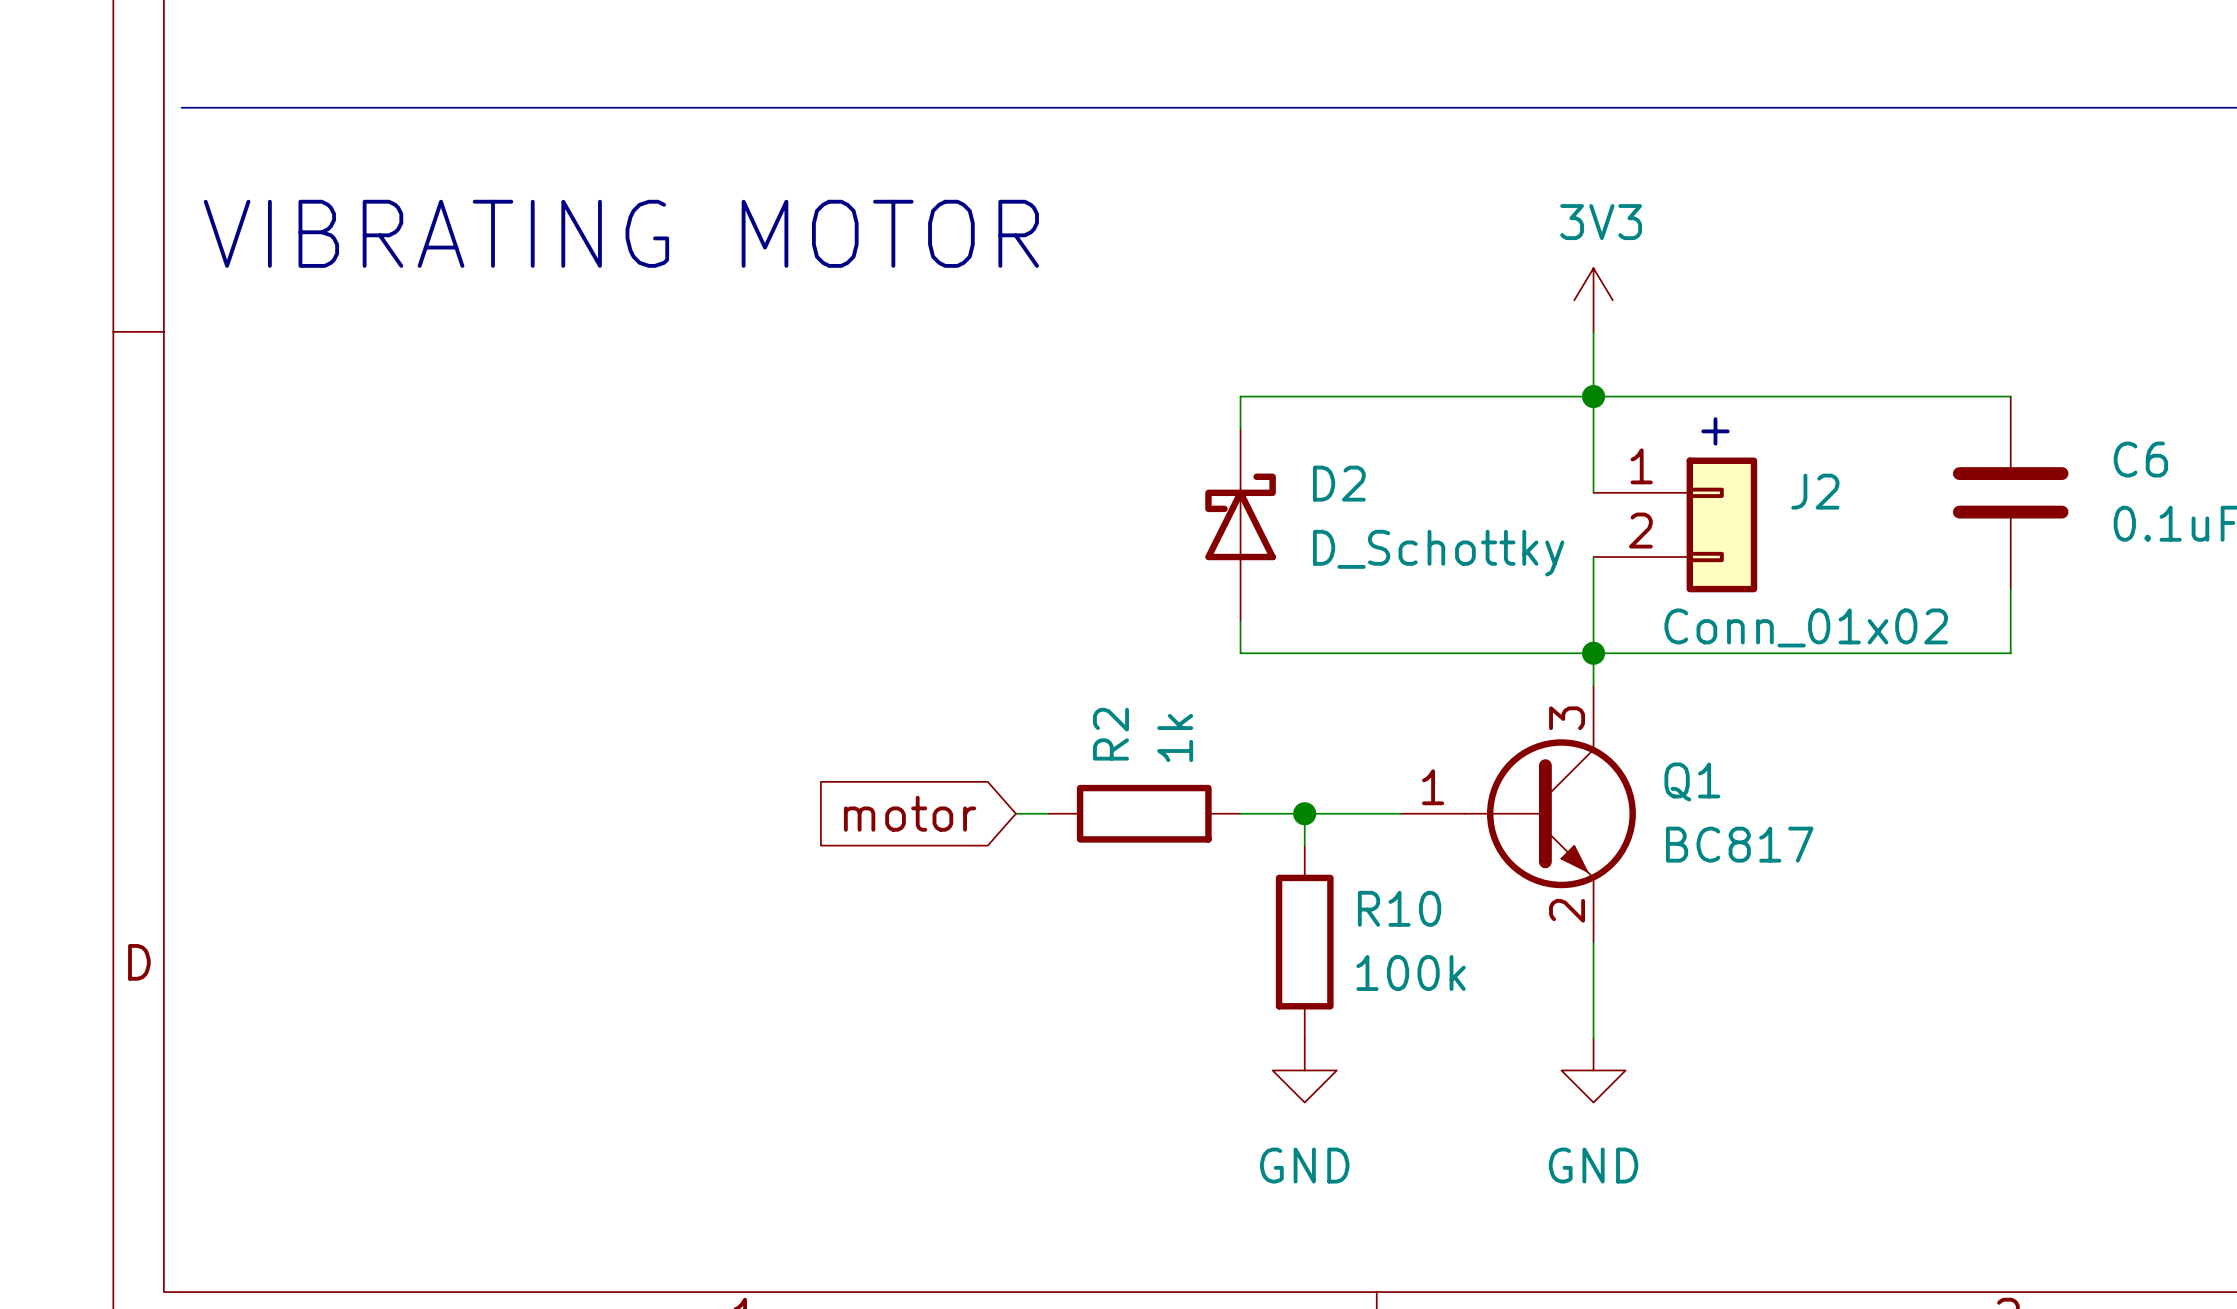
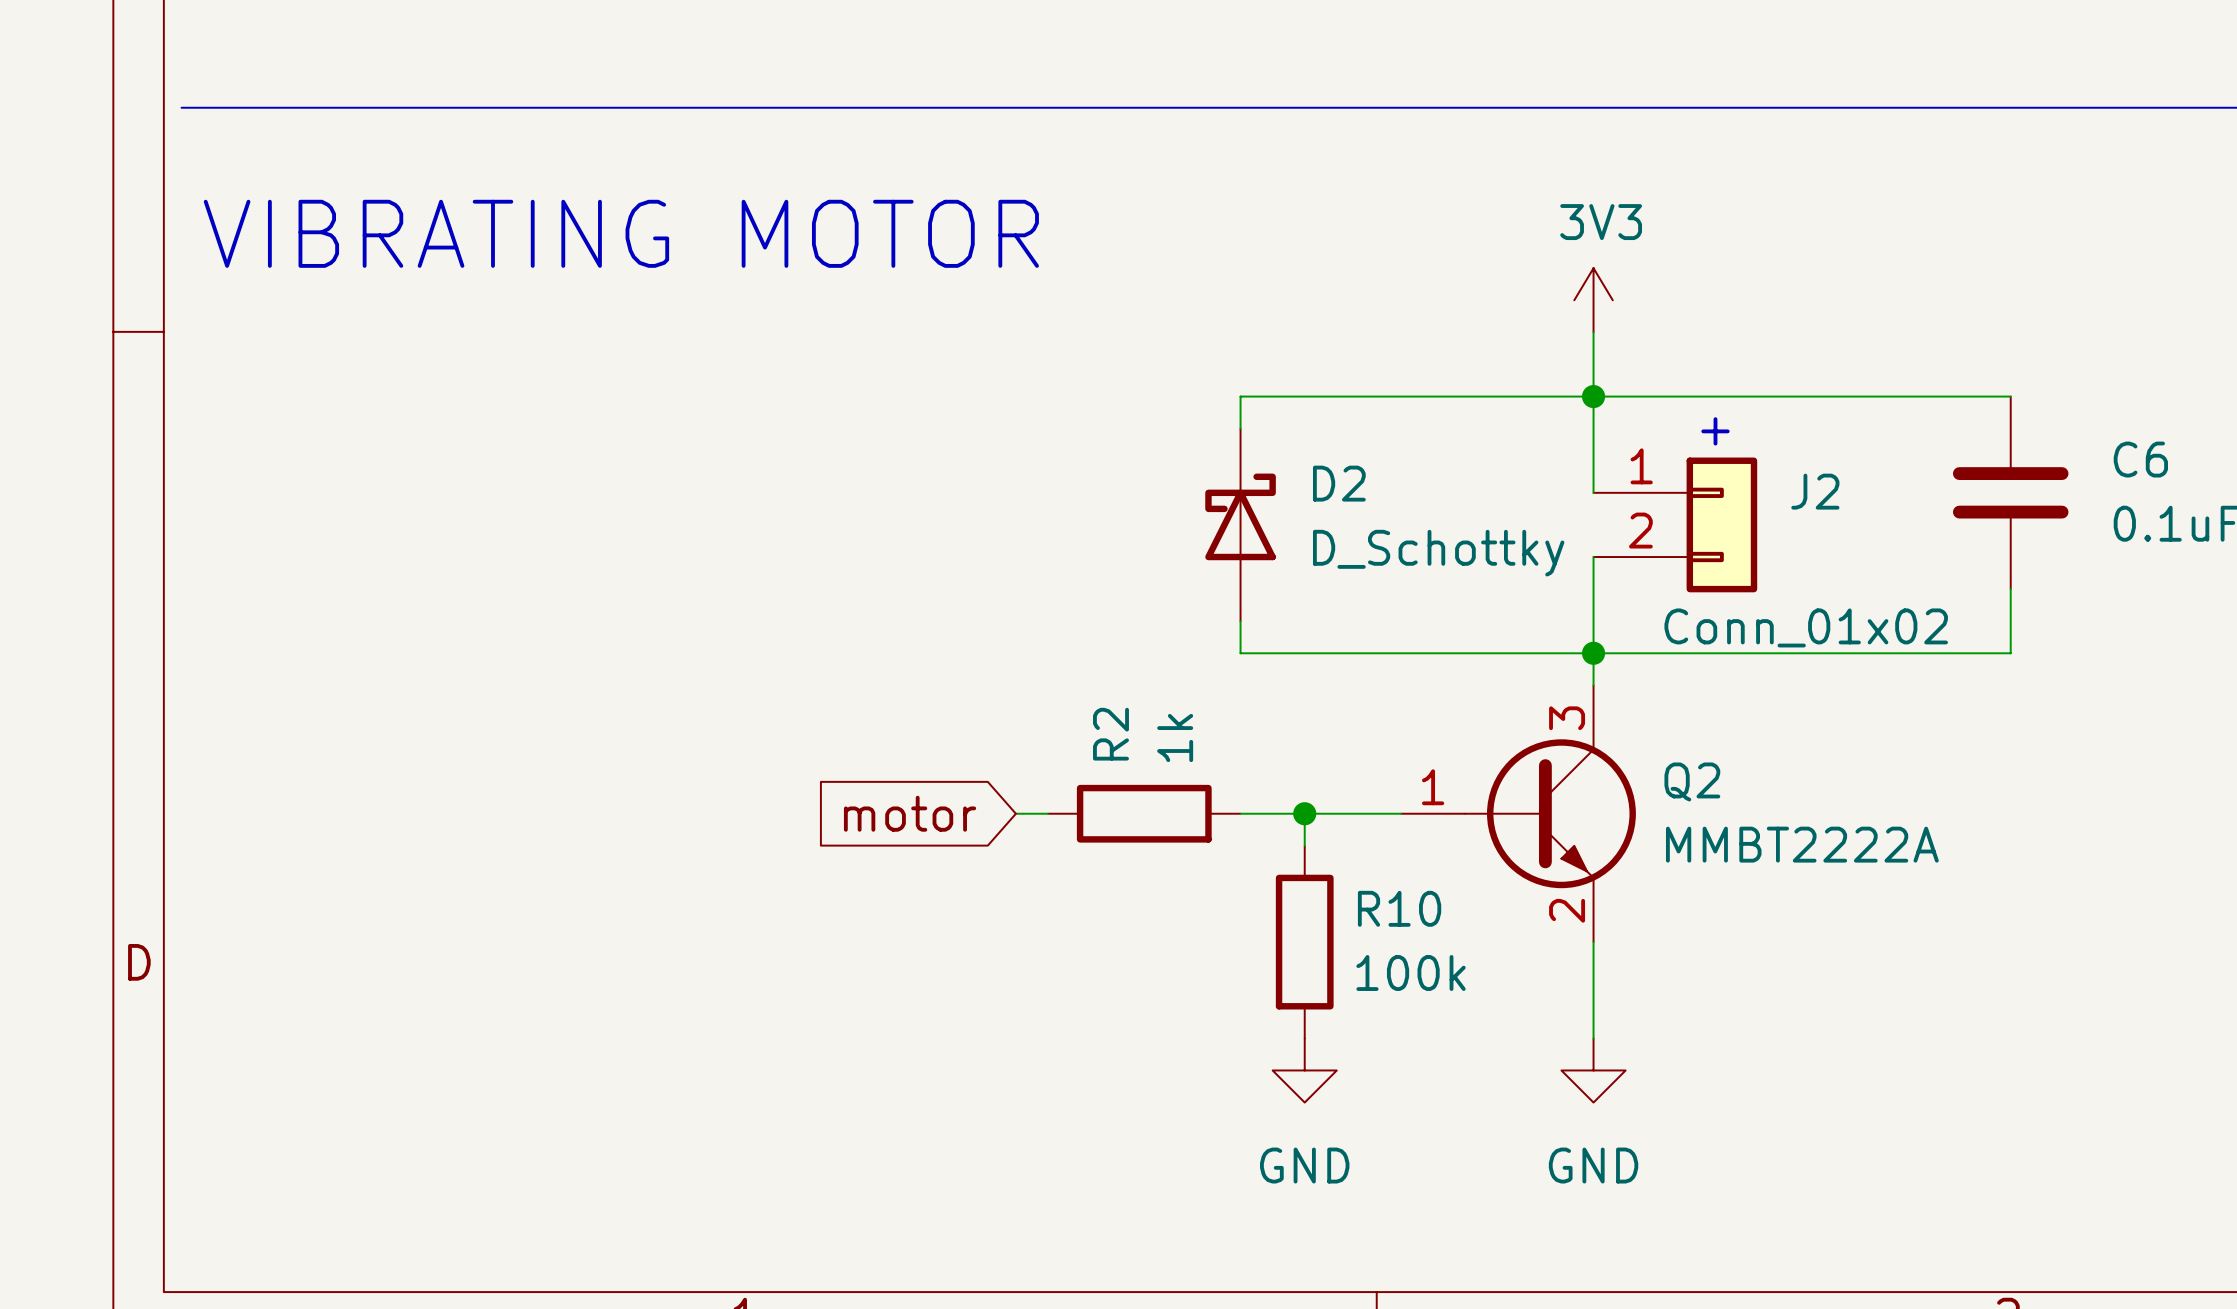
Q1 name: Q1 (1692, 781) -> Q2 (1692, 781)
Q1 value: BC817 (1739, 844) -> MMBT2222A (1802, 844)

